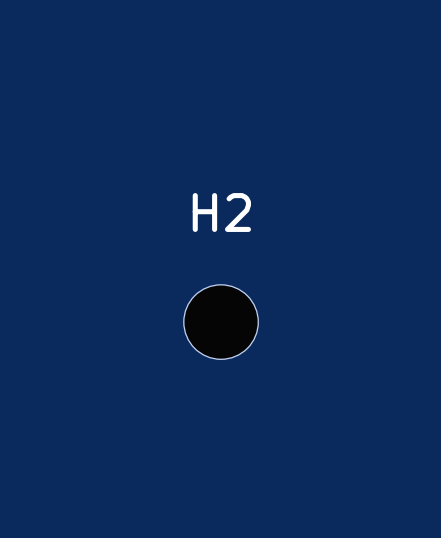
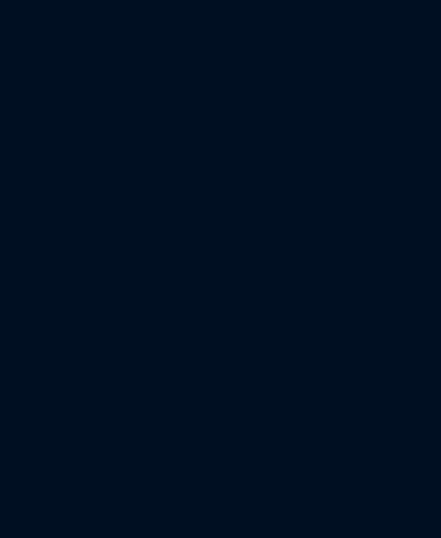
H2: (221, 322) -> none

